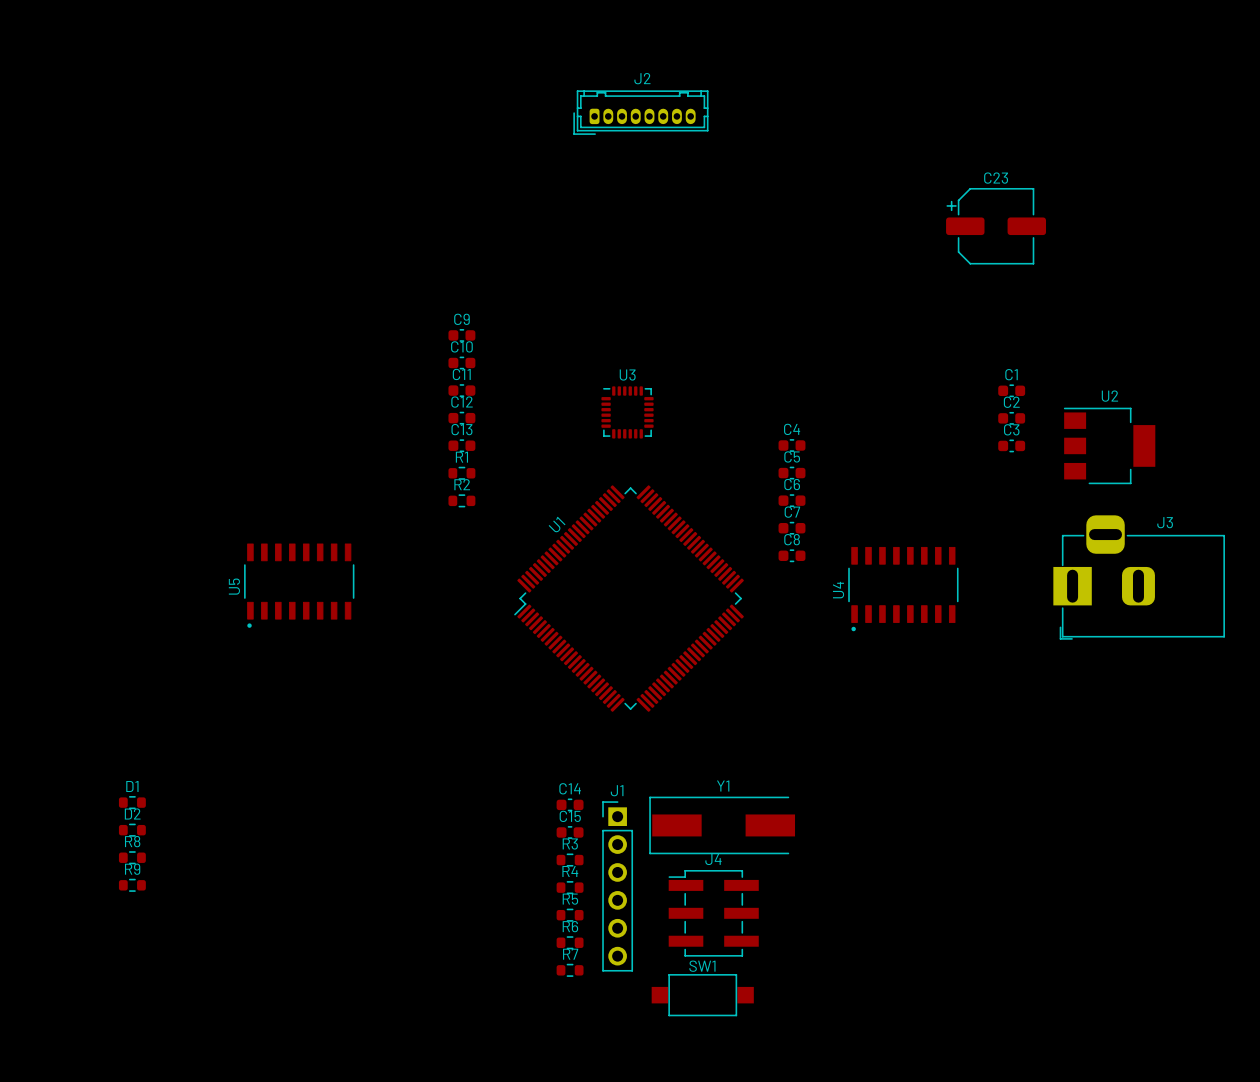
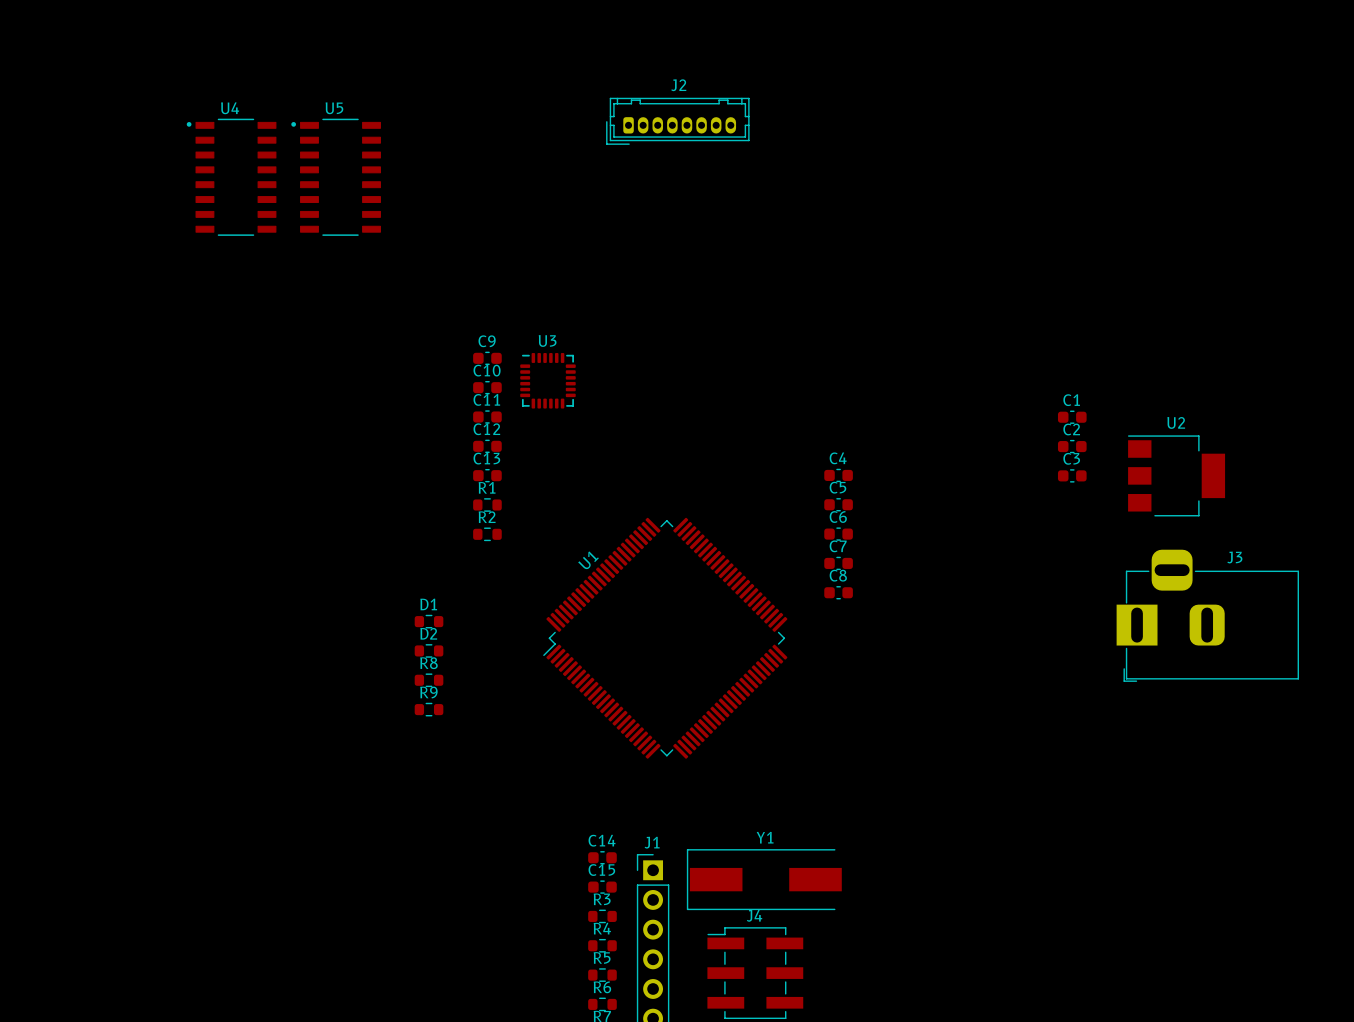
C23: (996, 226) -> none
U3 position: (627, 412) -> (547, 380)
U5 rotation: 0° (299, 585) -> 90° clockwise (336, 177)
U5 position: (299, 585) -> (336, 177)
U4 rotation: 0° (903, 589) -> 90° clockwise (231, 177)
U4 position: (903, 589) -> (231, 177)
D1 position: (132, 802) -> (429, 621)
D2 position: (132, 830) -> (429, 650)
R8 position: (132, 857) -> (429, 680)
R9 position: (132, 885) -> (429, 709)

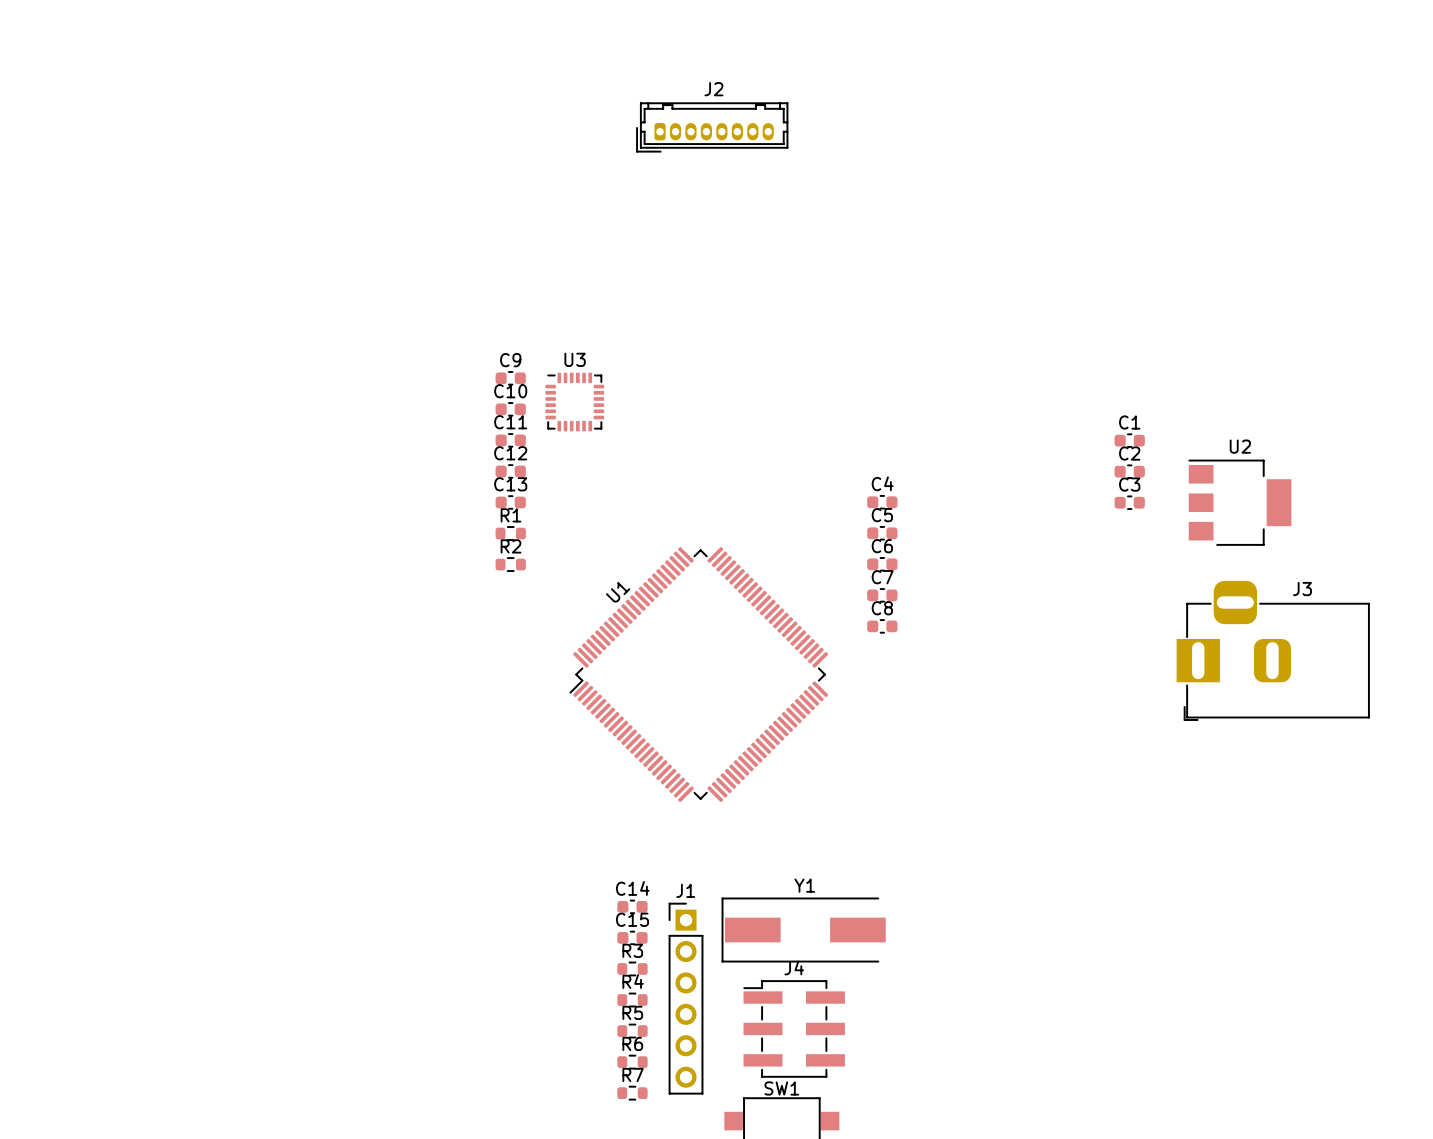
U4: (231, 177) -> none
U5: (336, 177) -> none
D1: (429, 621) -> none
D2: (429, 650) -> none
R8: (429, 680) -> none
R9: (429, 709) -> none

